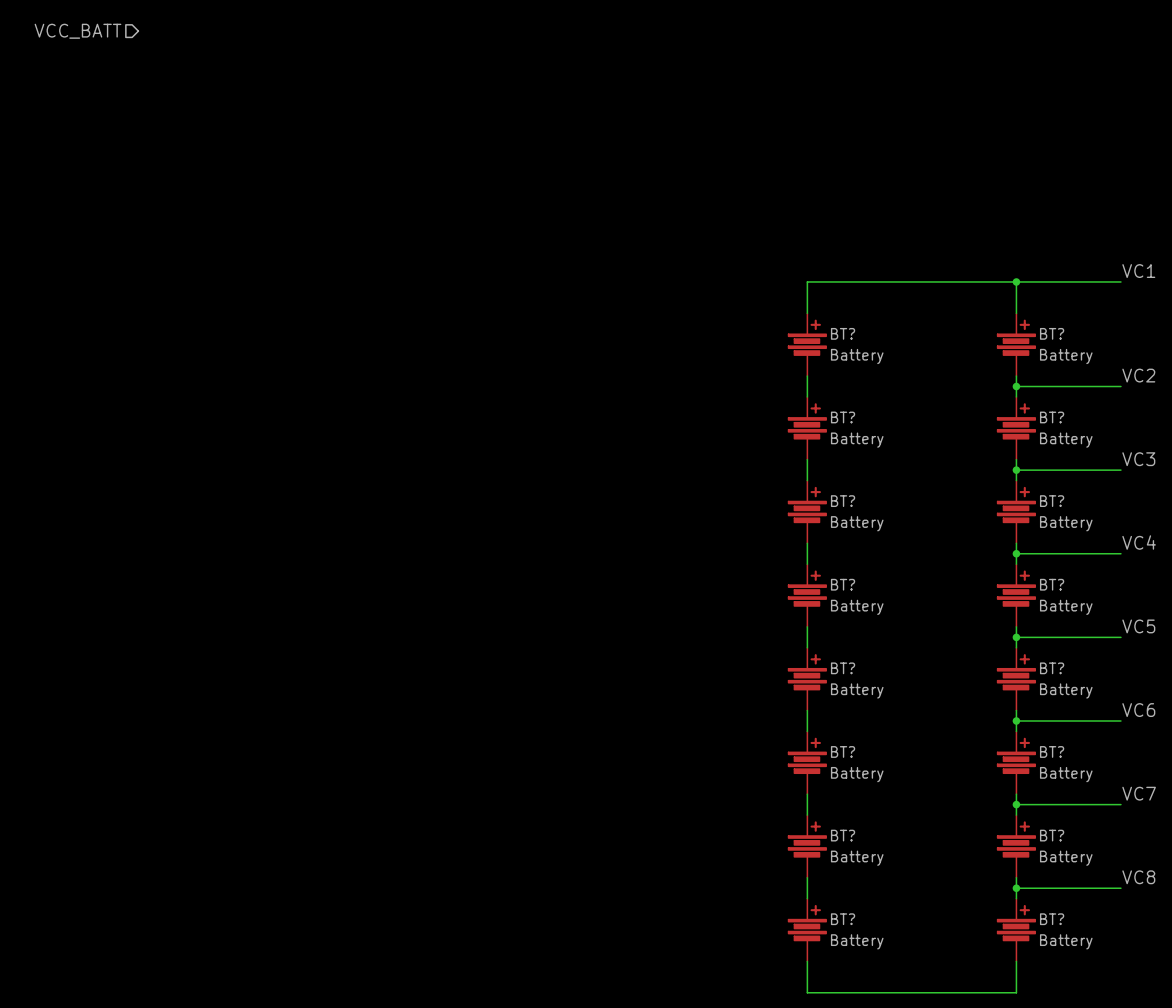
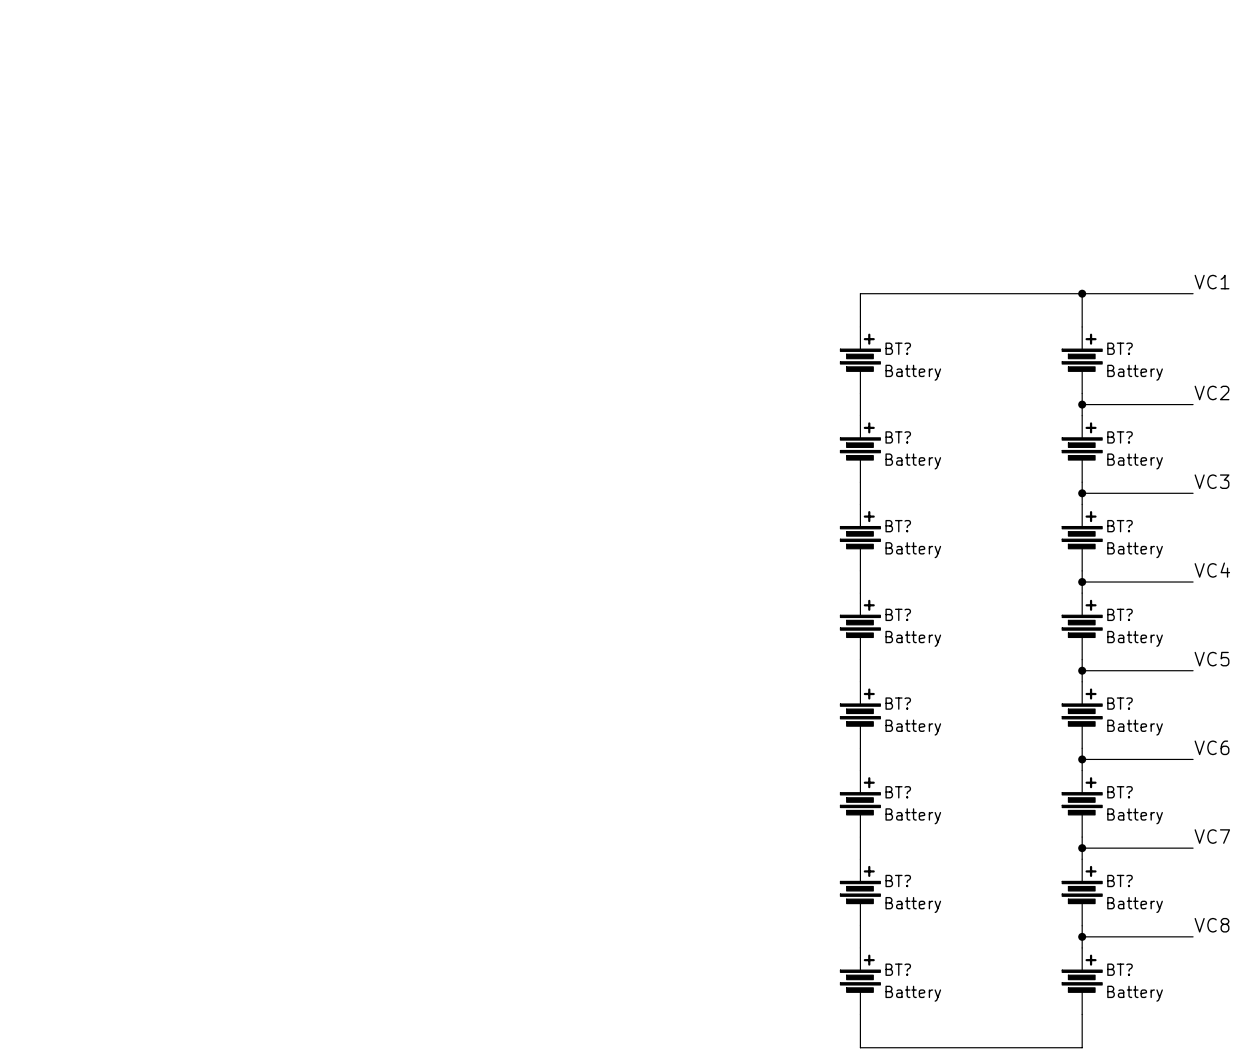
hierarchical label: VCC_BATT (78, 31) -> none

